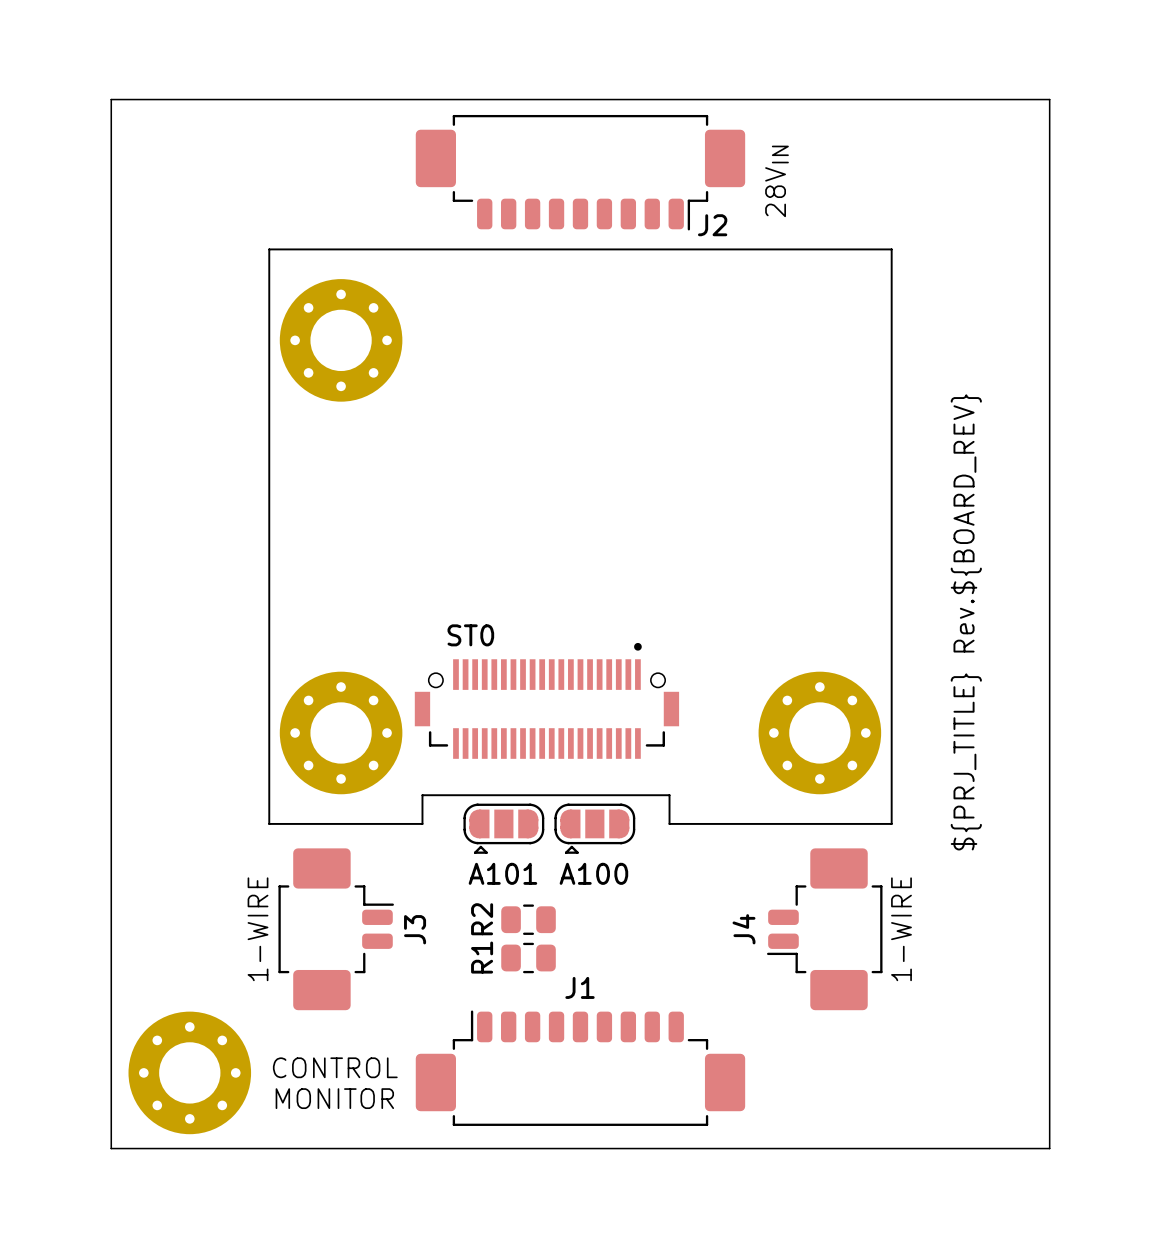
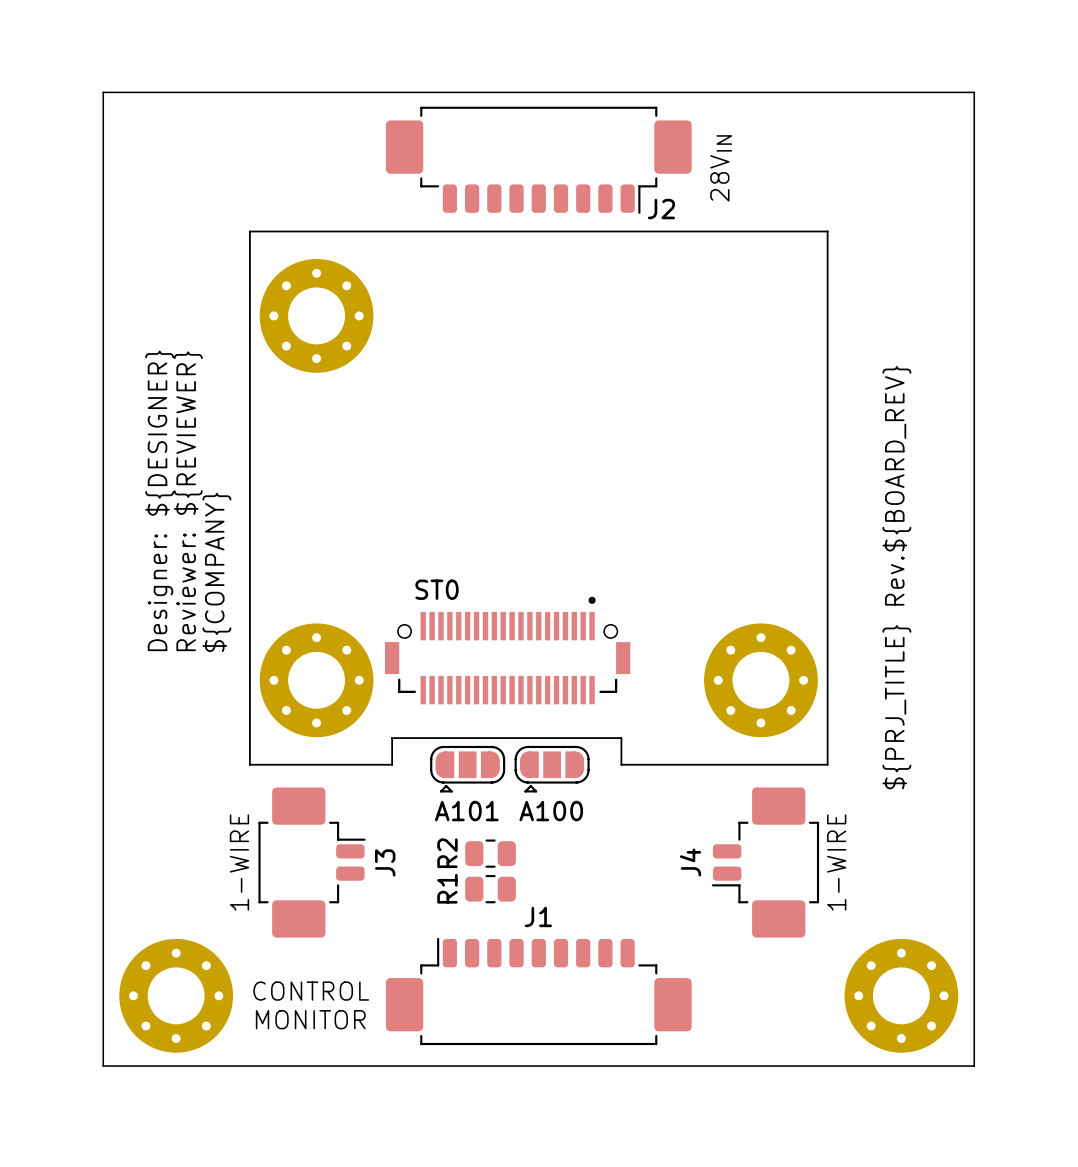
text: none -> Designer: ${DESIGNER} (159, 500)
text: none -> Reviewer: ${REVIEWER} (188, 501)
text: none -> ${COMPANY} (216, 572)
part: none -> (901, 995)

